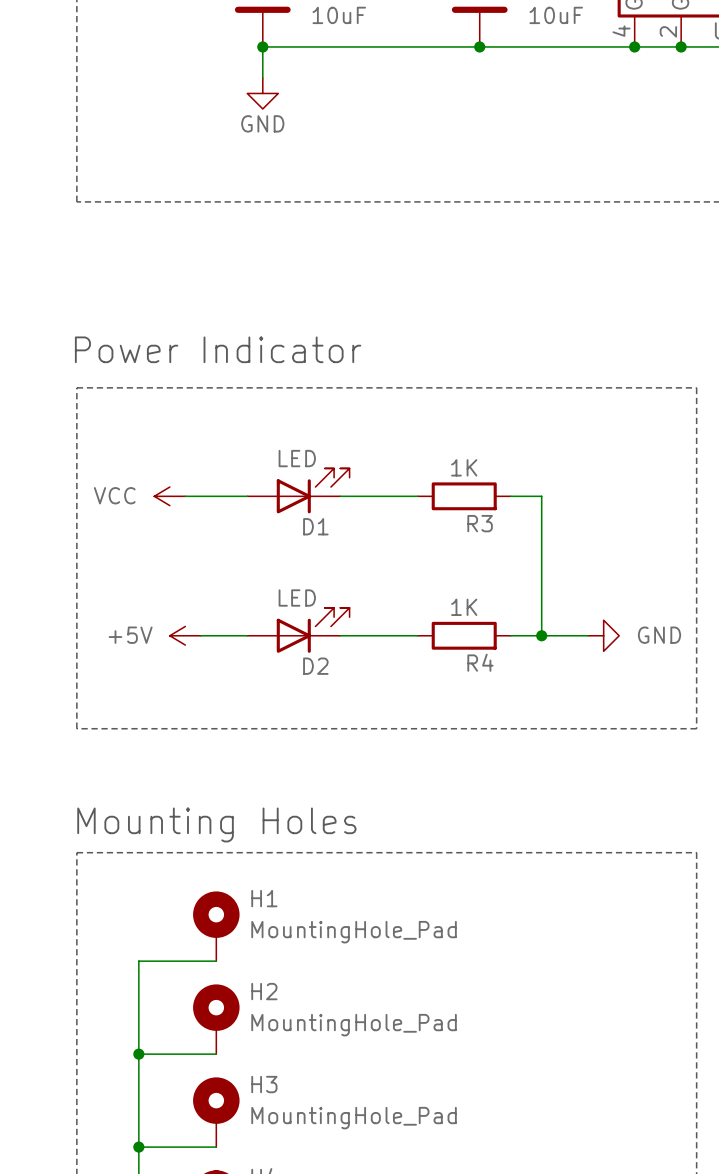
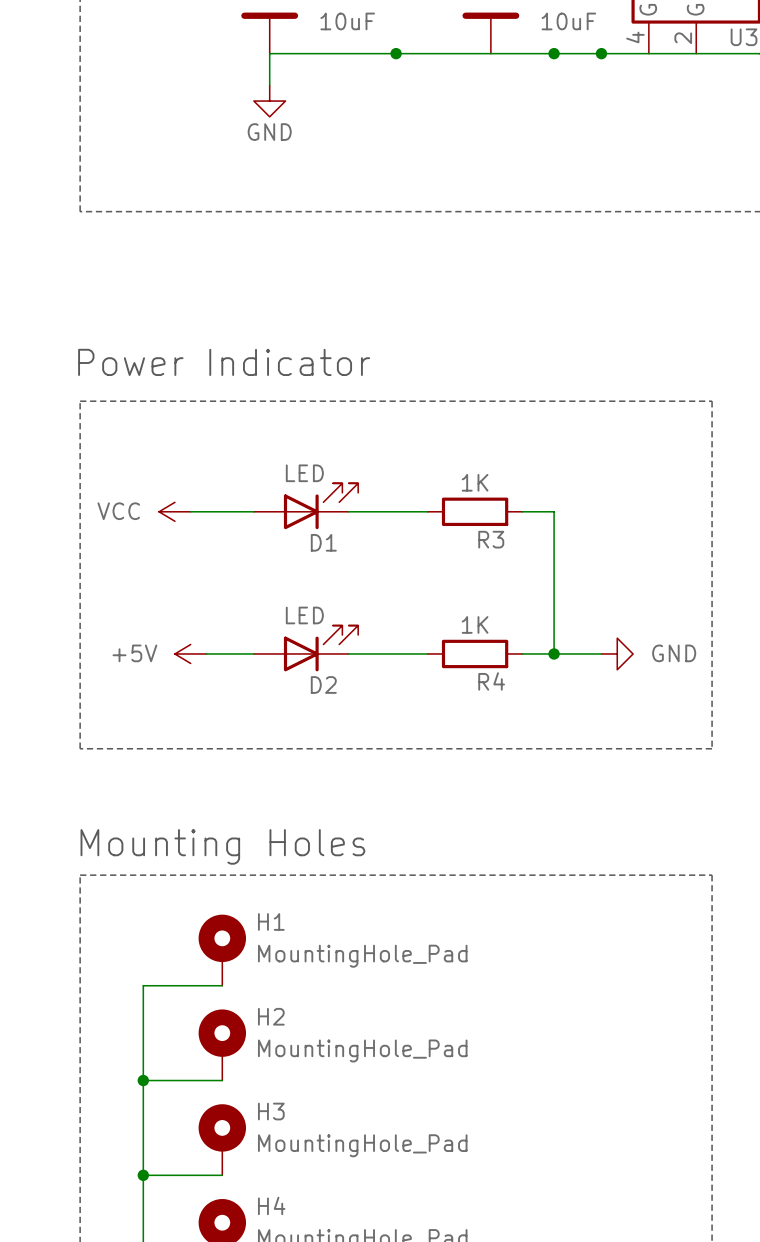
junction: (262, 46) -> none
junction: none -> (396, 53)
junction: (479, 46) -> none
junction: none -> (554, 53)
junction: none -> (601, 53)
junction: (634, 46) -> none
junction: (681, 46) -> none

